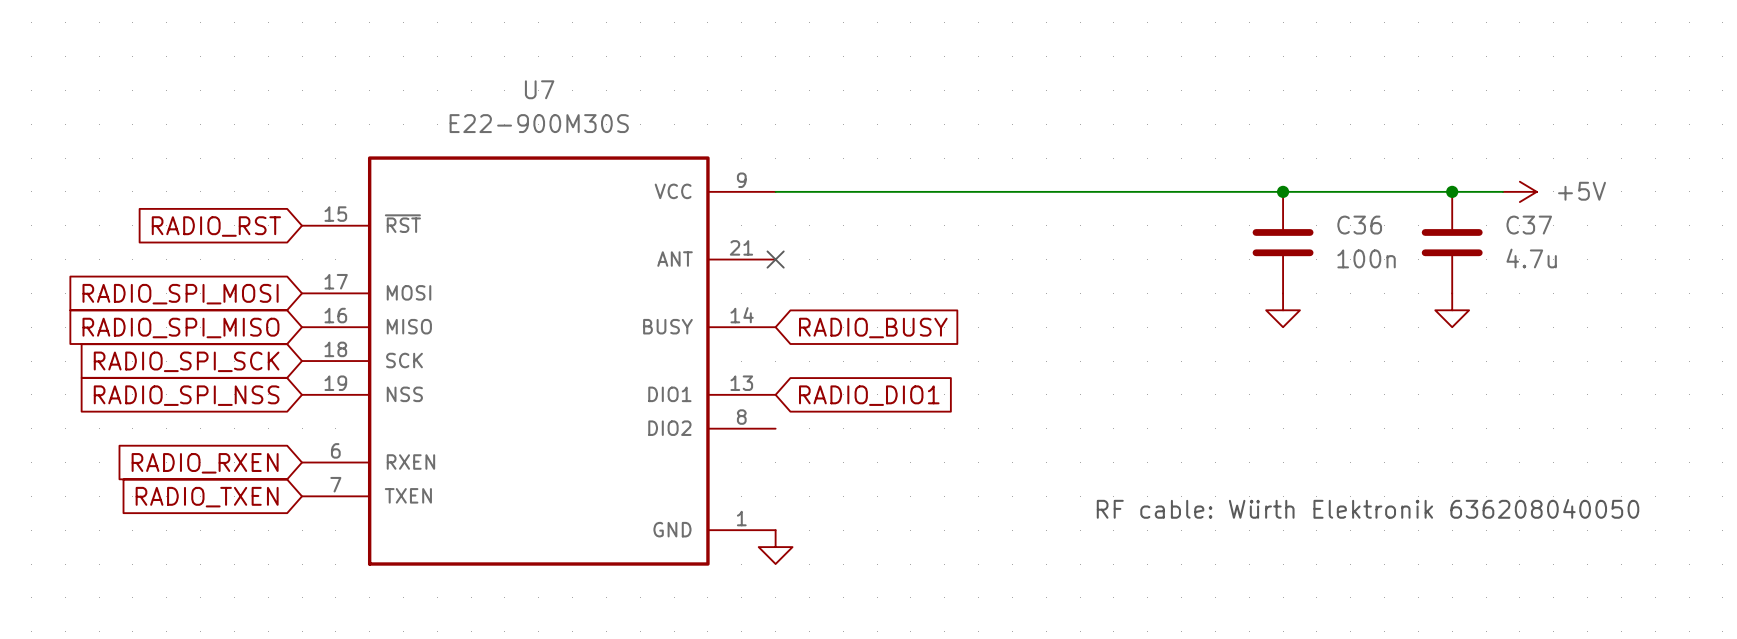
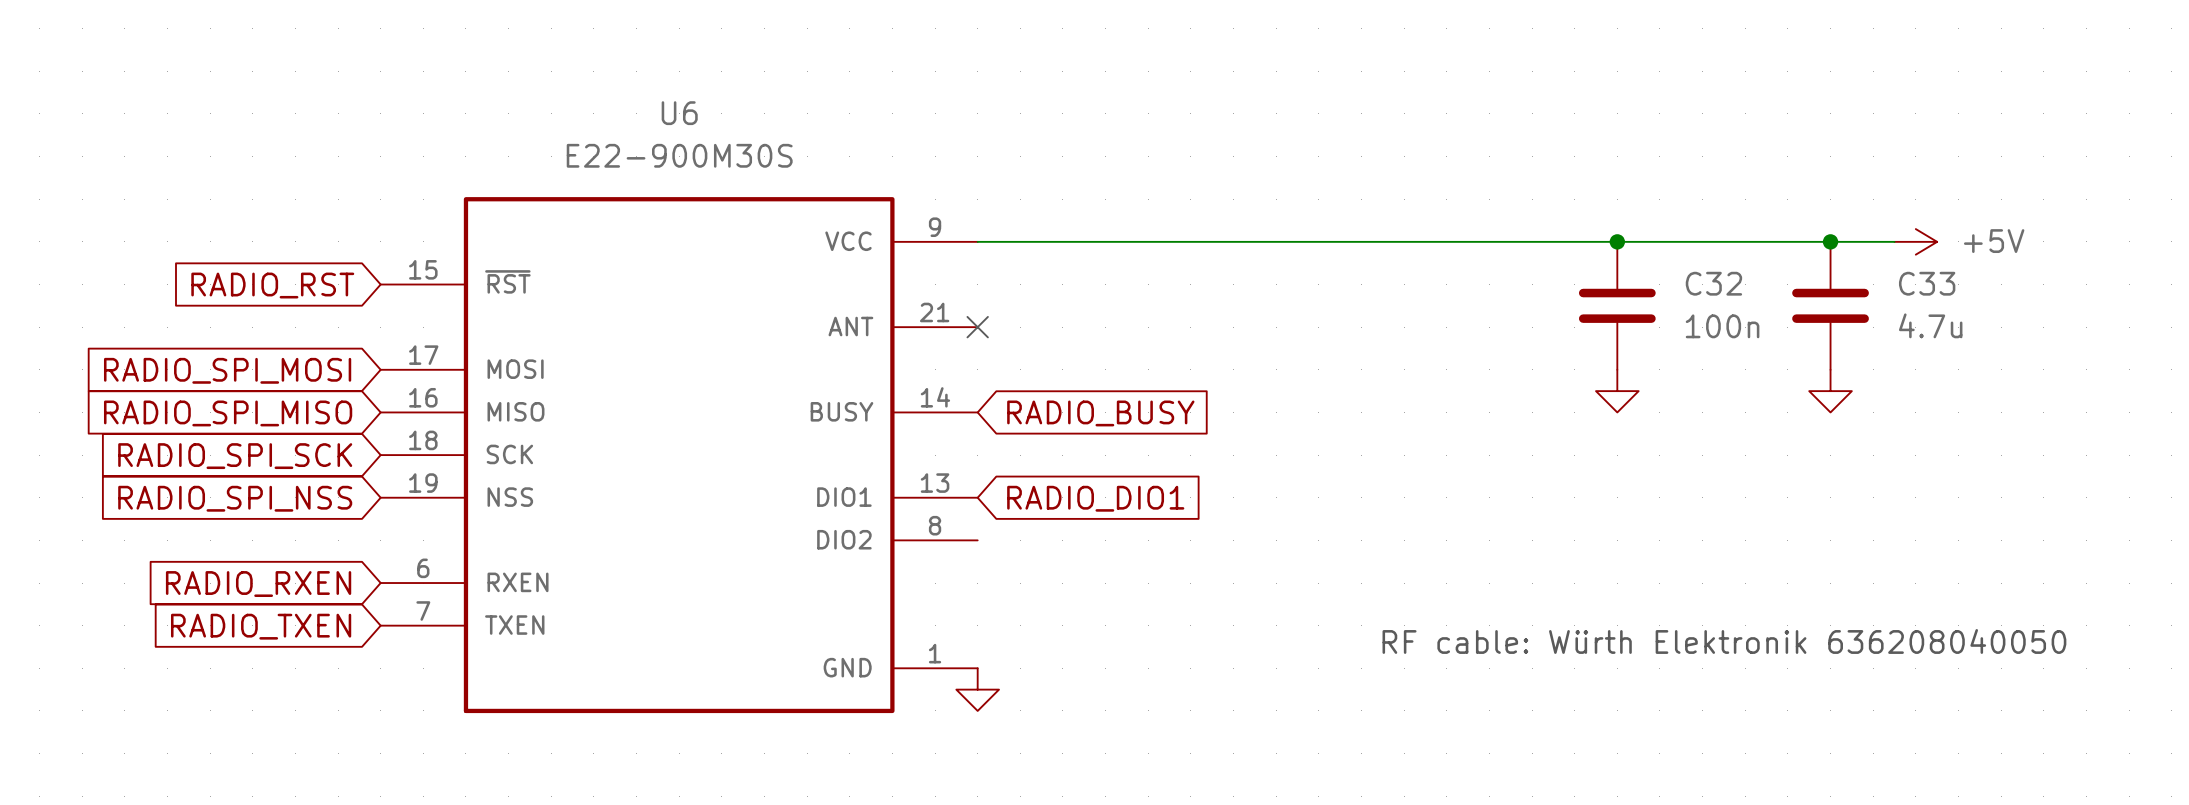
U7 name: U7 (539, 89) -> U6 (679, 113)
C36 name: C36 (1359, 225) -> C32 (1713, 283)
C37 name: C37 (1529, 225) -> C33 (1927, 283)

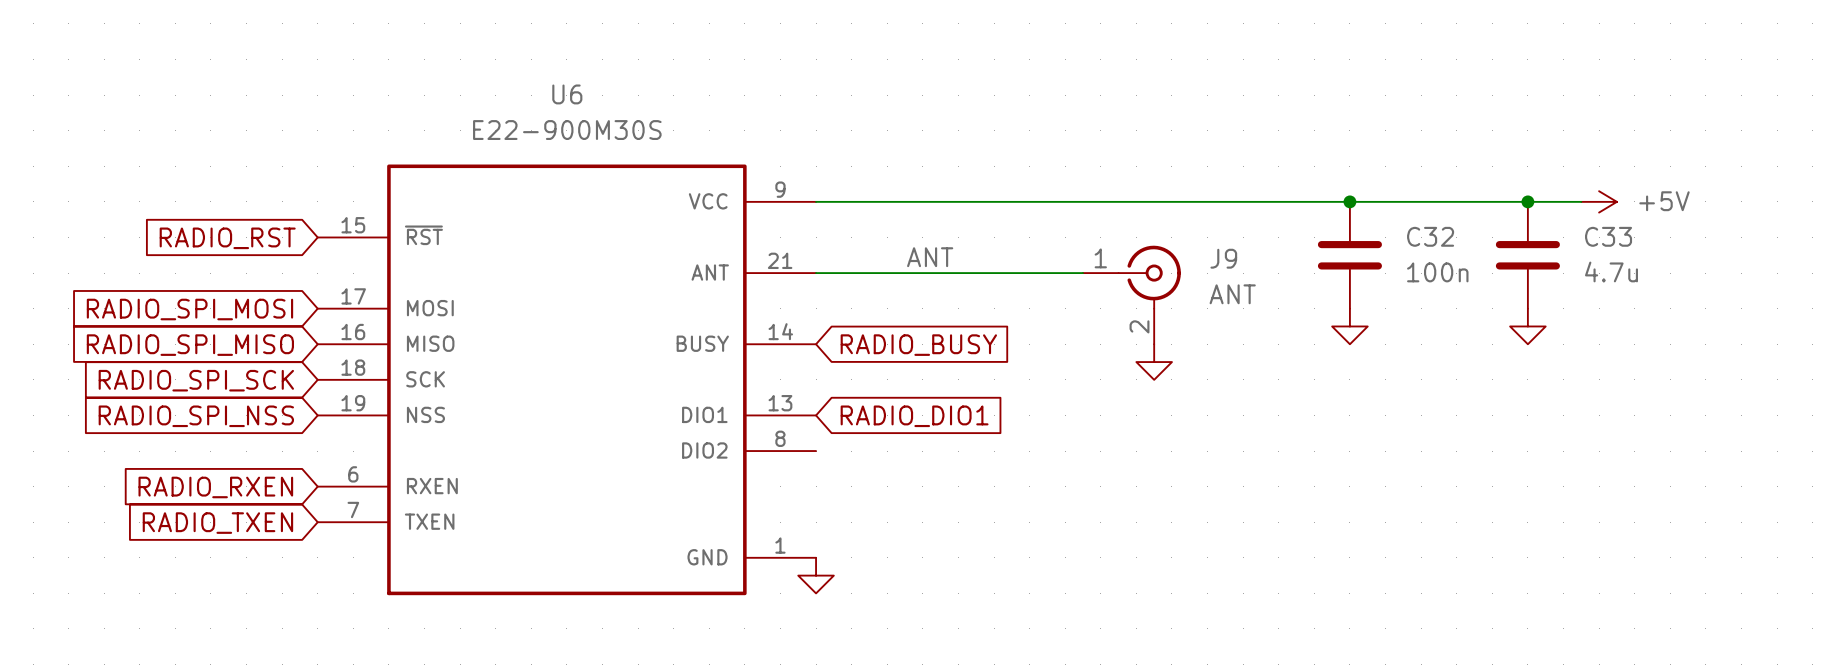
label: none -> ANT (930, 257)
wire: none -> (816, 273) (1082, 273)
no-connect mark: (977, 327) -> none
J9: none -> ANT (1131, 294)
power symbol: none -> (1154, 362)
text: RF cable: Würth Elektronik 636208040050 (1724, 641) -> none

